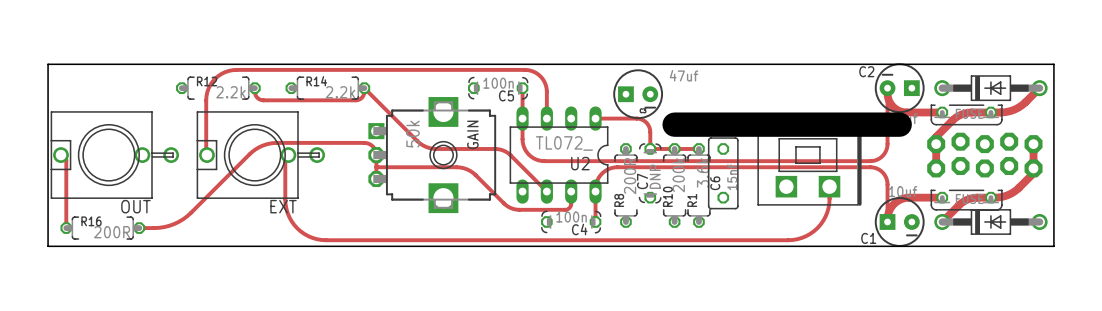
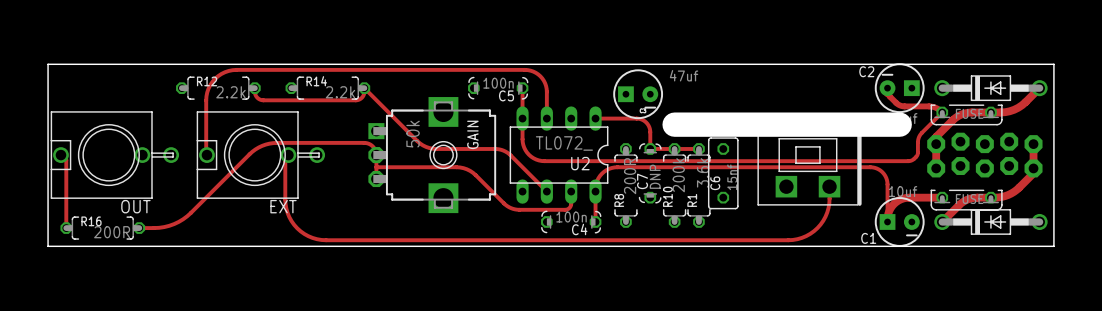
track: (942, 112) (899, 111) (891, 104) (887, 93) (886, 148) (880, 157) (870, 161) -> (887, 90) (889, 95) (900, 105) (931, 106) (942, 112) (920, 134) (917, 154) (913, 159) (908, 161) (870, 161)

